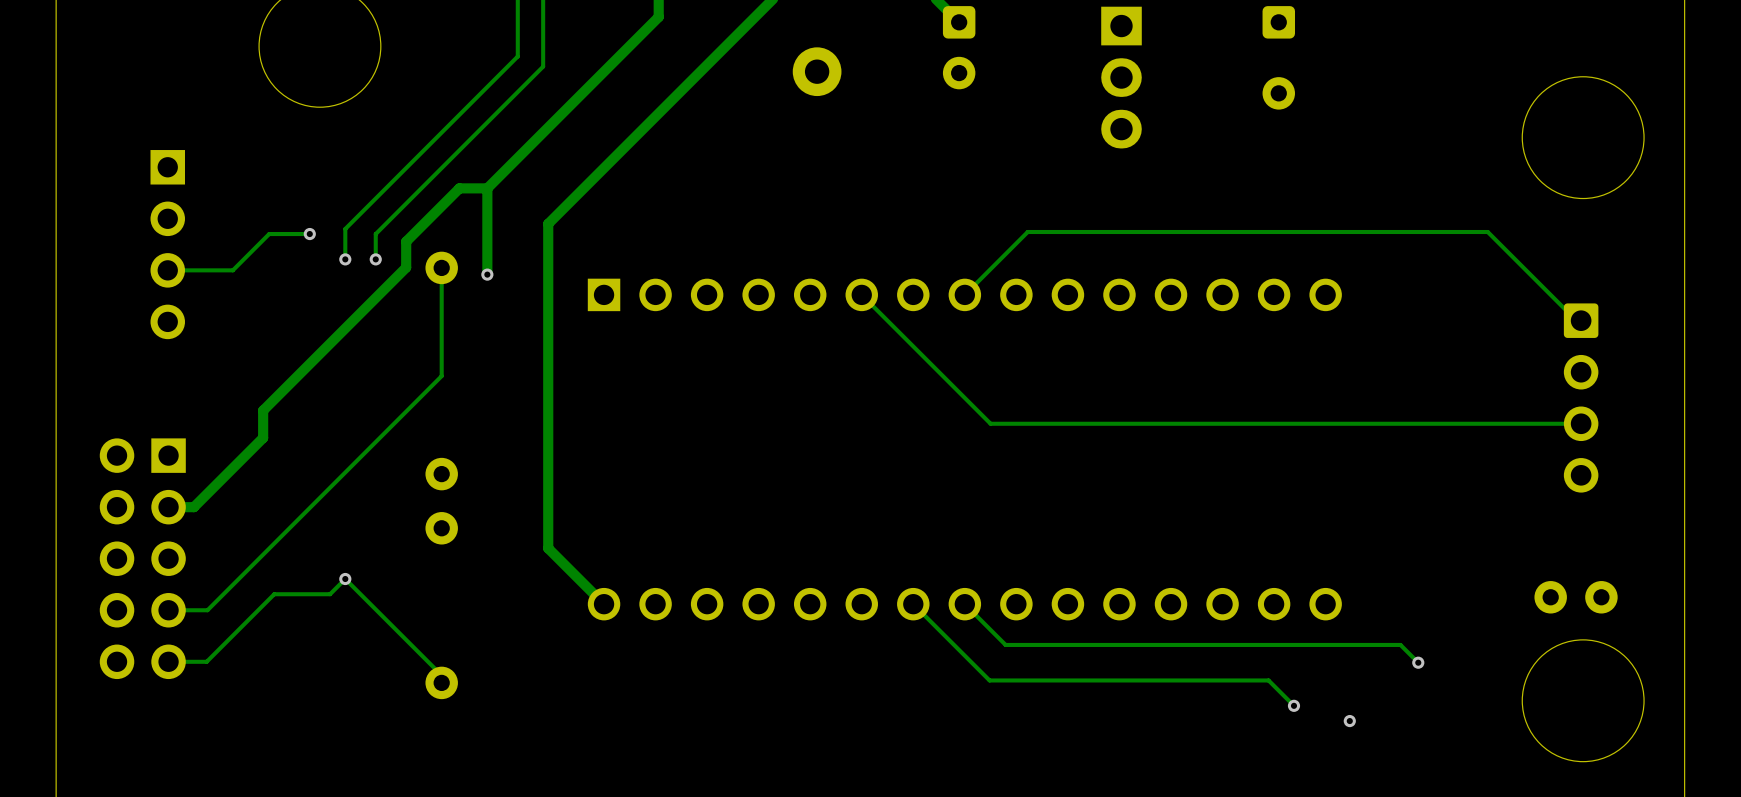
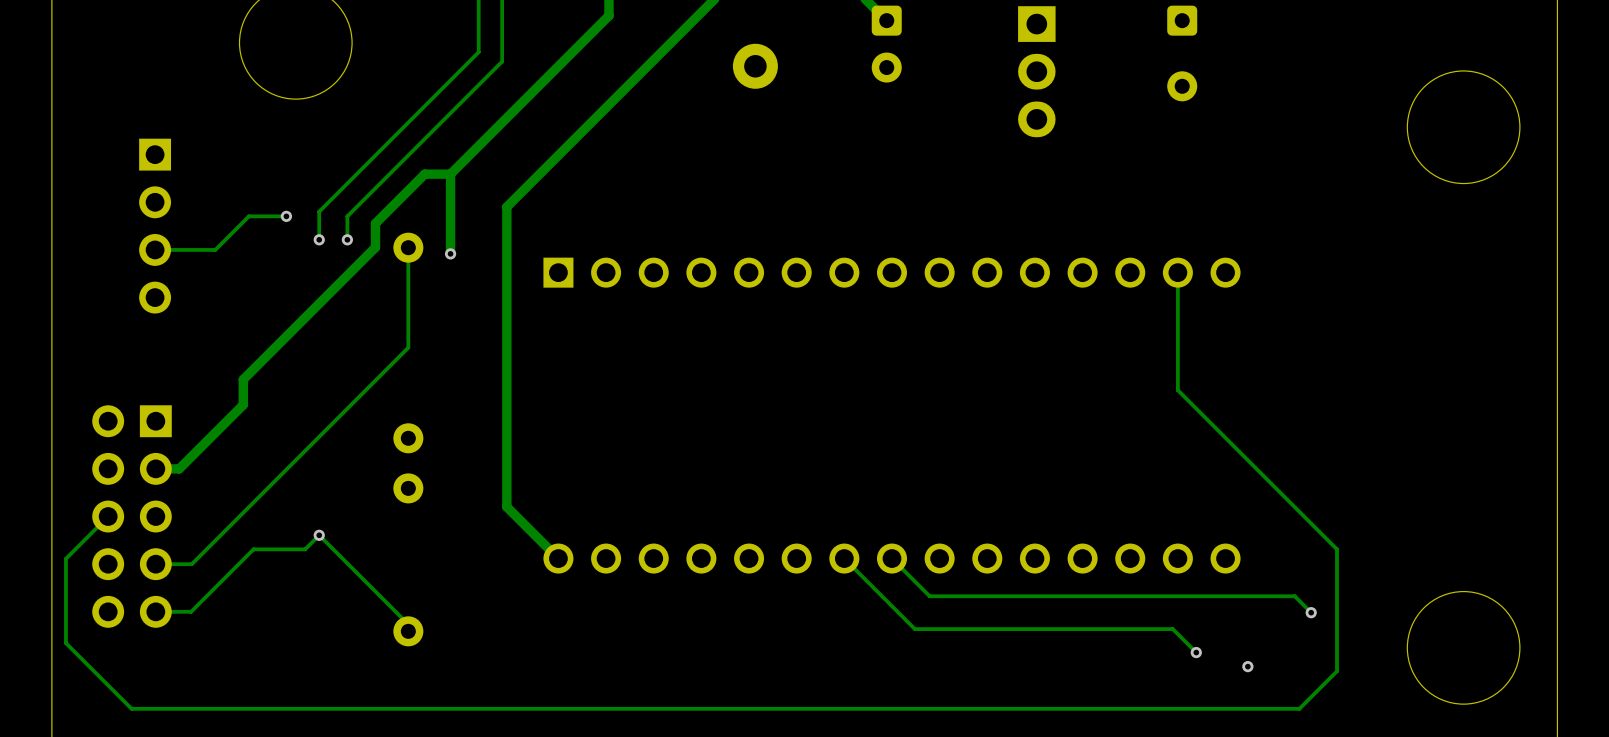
track: (861, 294) (990, 423) (1581, 423) -> none
track: (964, 294) (1027, 232) (1487, 232) (1576, 320) (1581, 320) -> none
track: none -> (1177, 272) (1177, 390) (1336, 549) (1336, 671) (1299, 708) (131, 708) (65, 643) (65, 558) (108, 516)
part: (1581, 397) -> none
part: (1576, 597) -> none

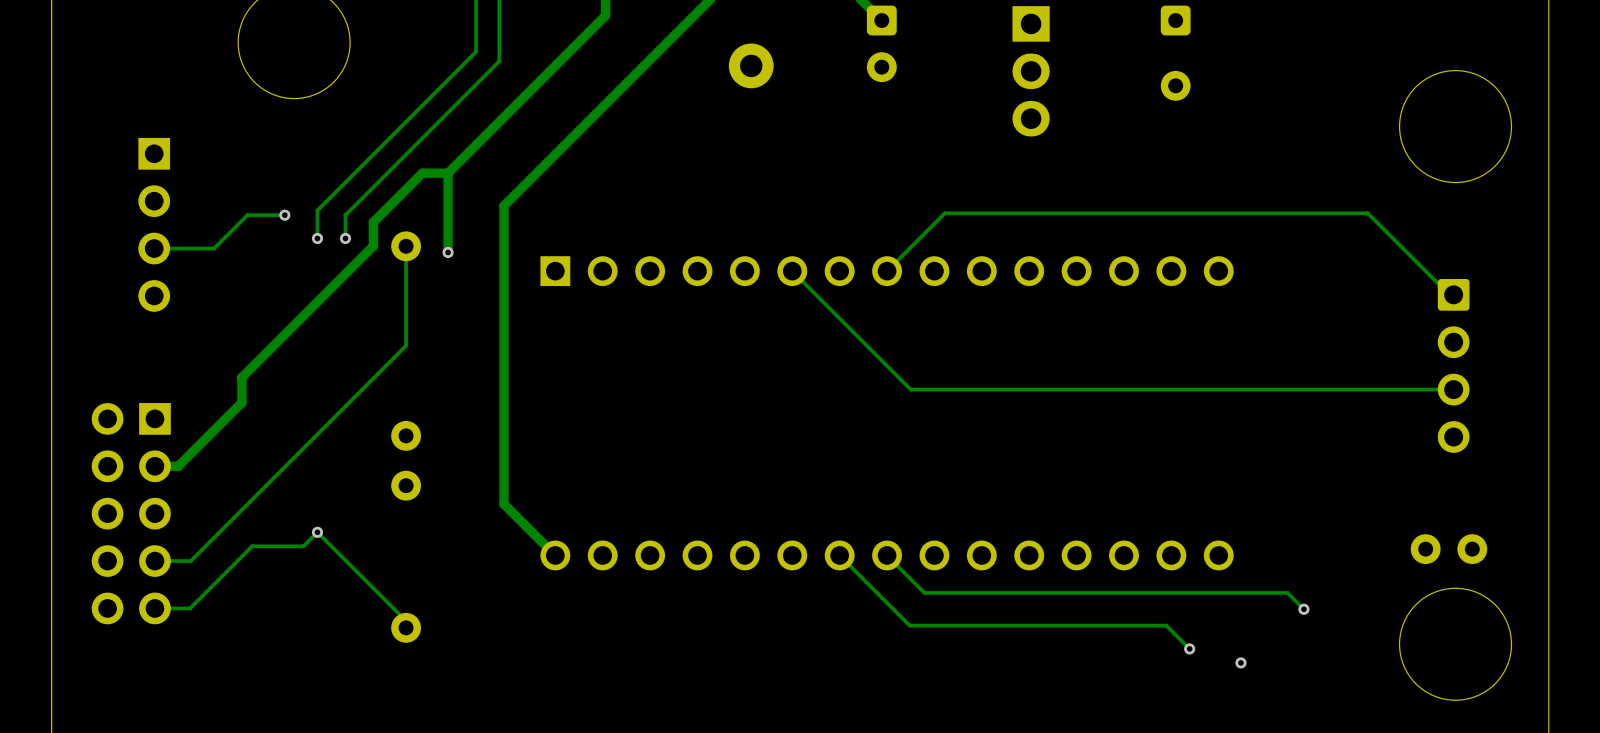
track: none -> (792, 271) (910, 389) (1453, 389)
track: none -> (887, 271) (944, 213) (1367, 213) (1449, 294) (1453, 294)
track: (1177, 272) (1177, 390) (1336, 549) (1336, 671) (1299, 708) (131, 708) (65, 643) (65, 558) (108, 516) -> none
part: none -> (1453, 365)
part: none -> (1449, 549)

